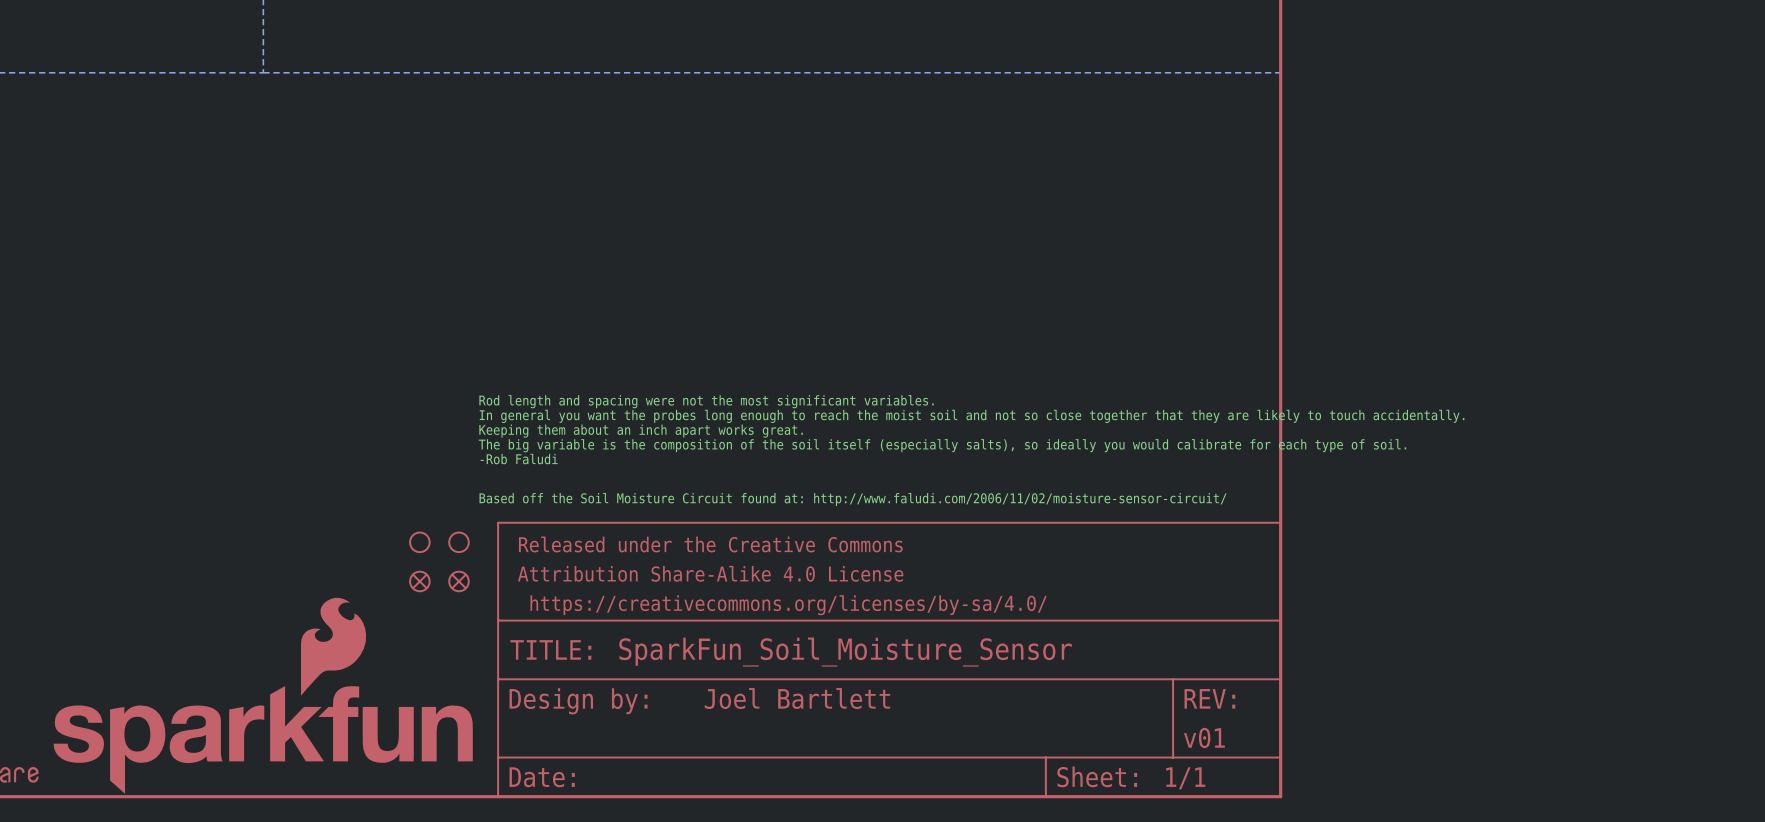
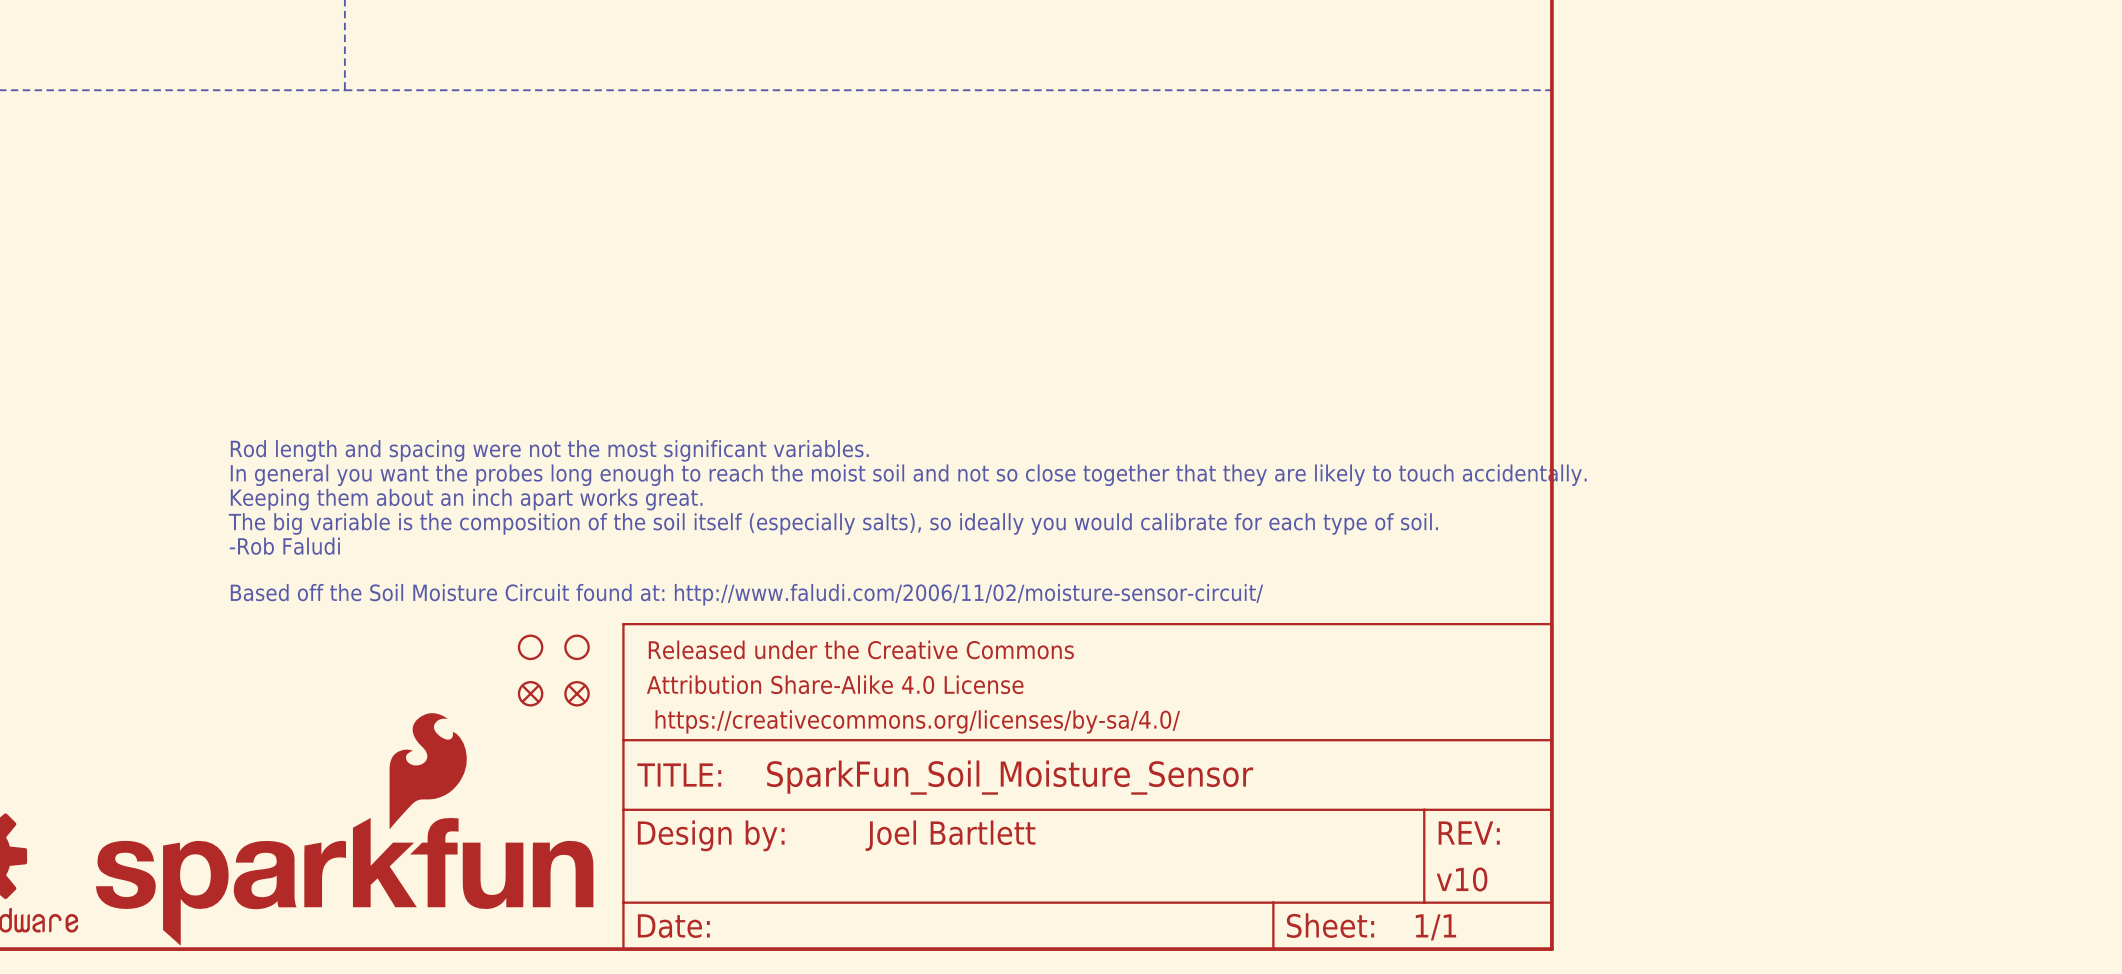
text: none -> Rod length and spacing were not the most significant variables. (549, 450)
text: none -> In general you want the probes long enough to reach the moist soil and not so close together that they are likely to touch accidentally. (908, 475)
text: Rod length and spacing were not the most significant variables. (706, 401) -> none
text: In general you want the probes long enough to reach the moist soil and not so close together that they are likely to touch accidentally. (972, 416) -> none
text: none -> Keeping them about an inch apart works great. (466, 499)
text: Keeping them about an inch apart works great. (641, 431) -> none
text: none -> The big variable is the composition of the soil itself (especially salts), so ideally you would calibrate for each type of soil. (833, 523)
text: The big variable is the composition of the soil itself (especially salts), so ideally you would calibrate for each type of soil. (942, 445) -> none
text: none -> -Rob Faludi (284, 546)
text: -Rob Faludi (519, 459) -> none
text: none -> Based off the Soil Moisture Circuit found at: http://www.faludi.com/2006/11/02/moisture-sensor-circuit/ (746, 594)
text: Based off the Soil Moisture Circuit found at: http://www.faludi.com/2006/11/02/moisture-sensor-circuit/ (852, 499) -> none
part text: v01 (1204, 737) -> v10 (1462, 879)

